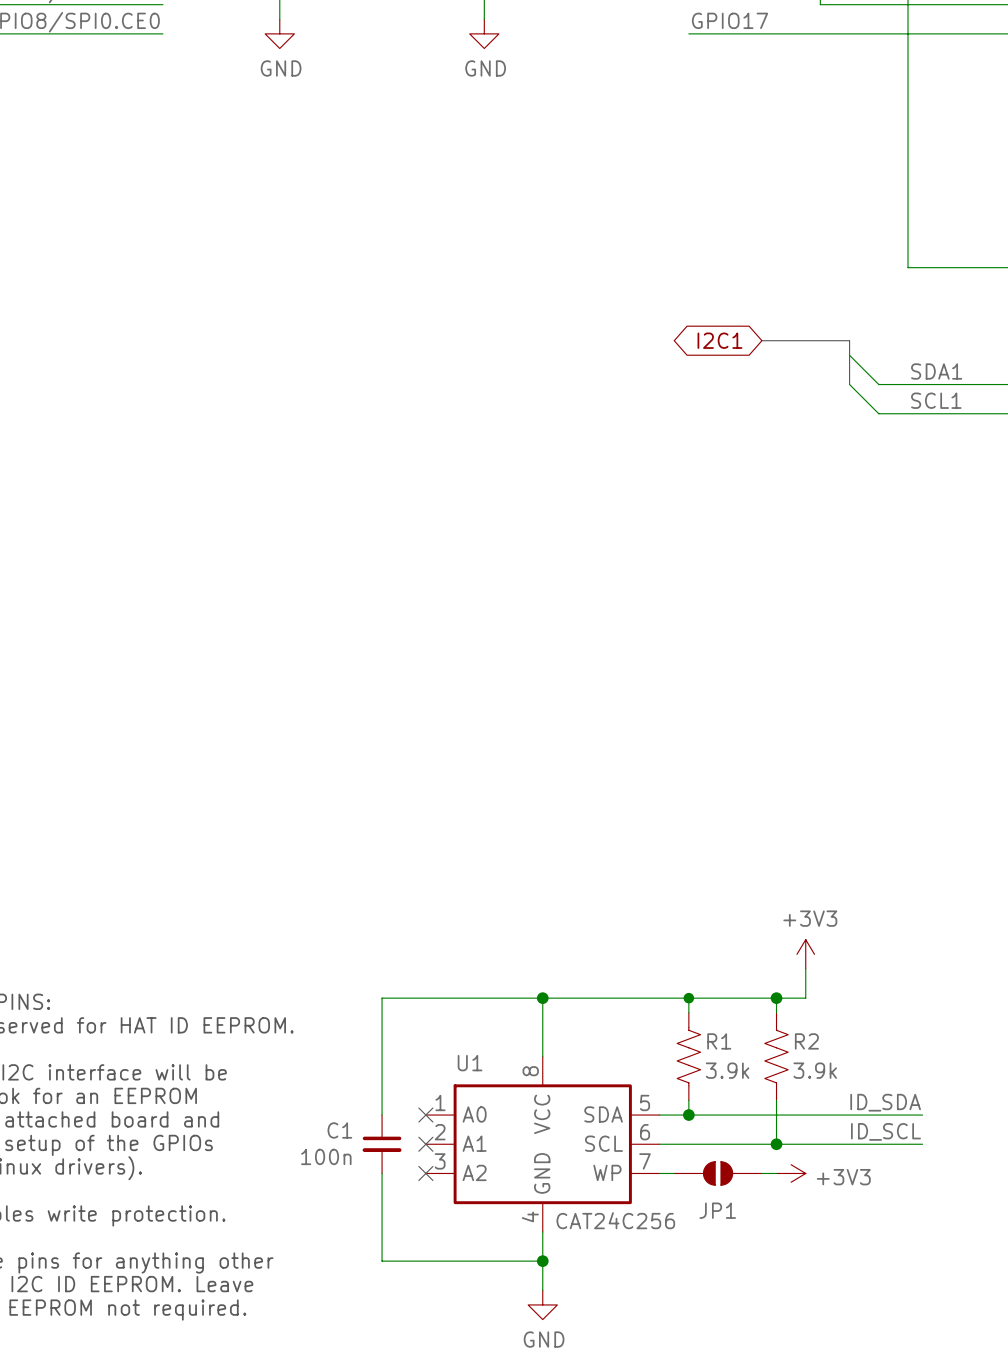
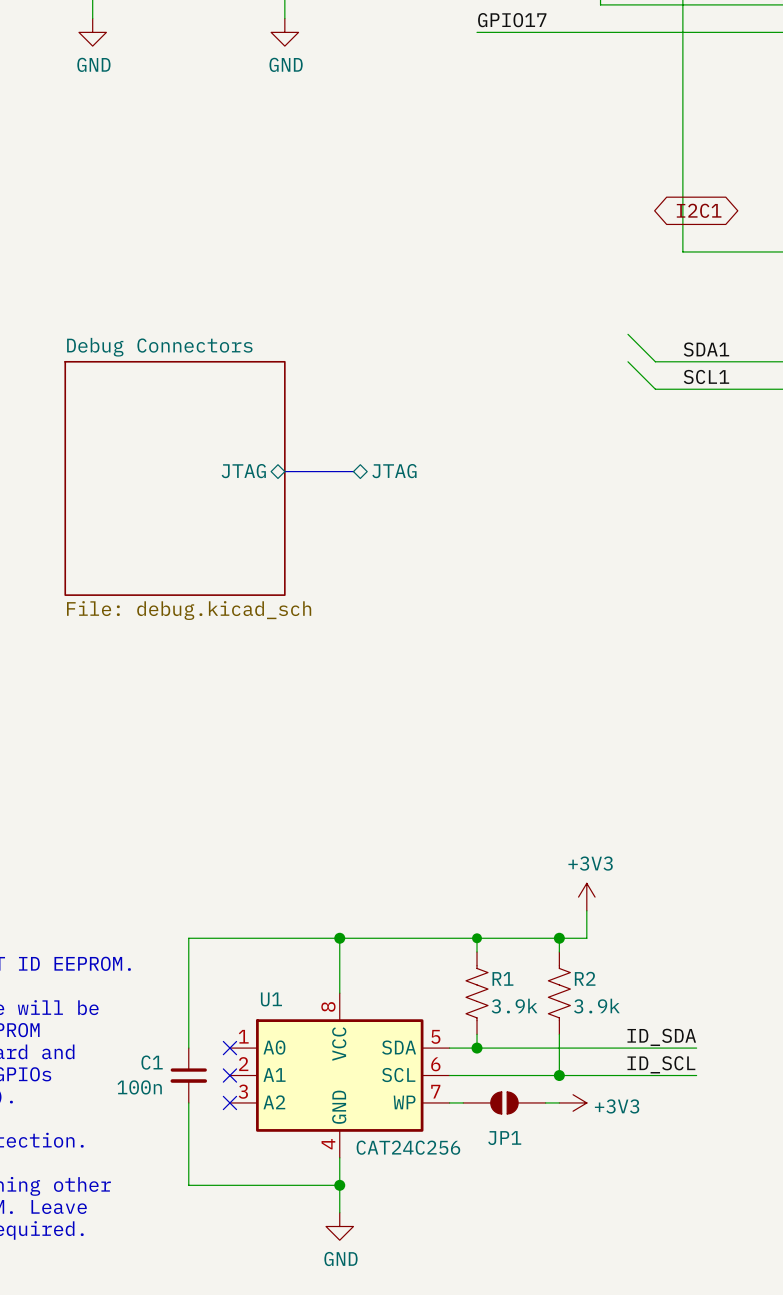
global label position: I2C1 (719, 340) -> I2C1 (699, 210)
bus: (761, 340) (849, 340) (849, 384) -> none
sheet pin: none -> JTAG (243, 471)
sheet pin: none -> JTAG (394, 471)
bus: none -> (284, 471) (353, 471)
sheet Debug Connectors: none -> File: debug.kicad_sch (175, 478)

